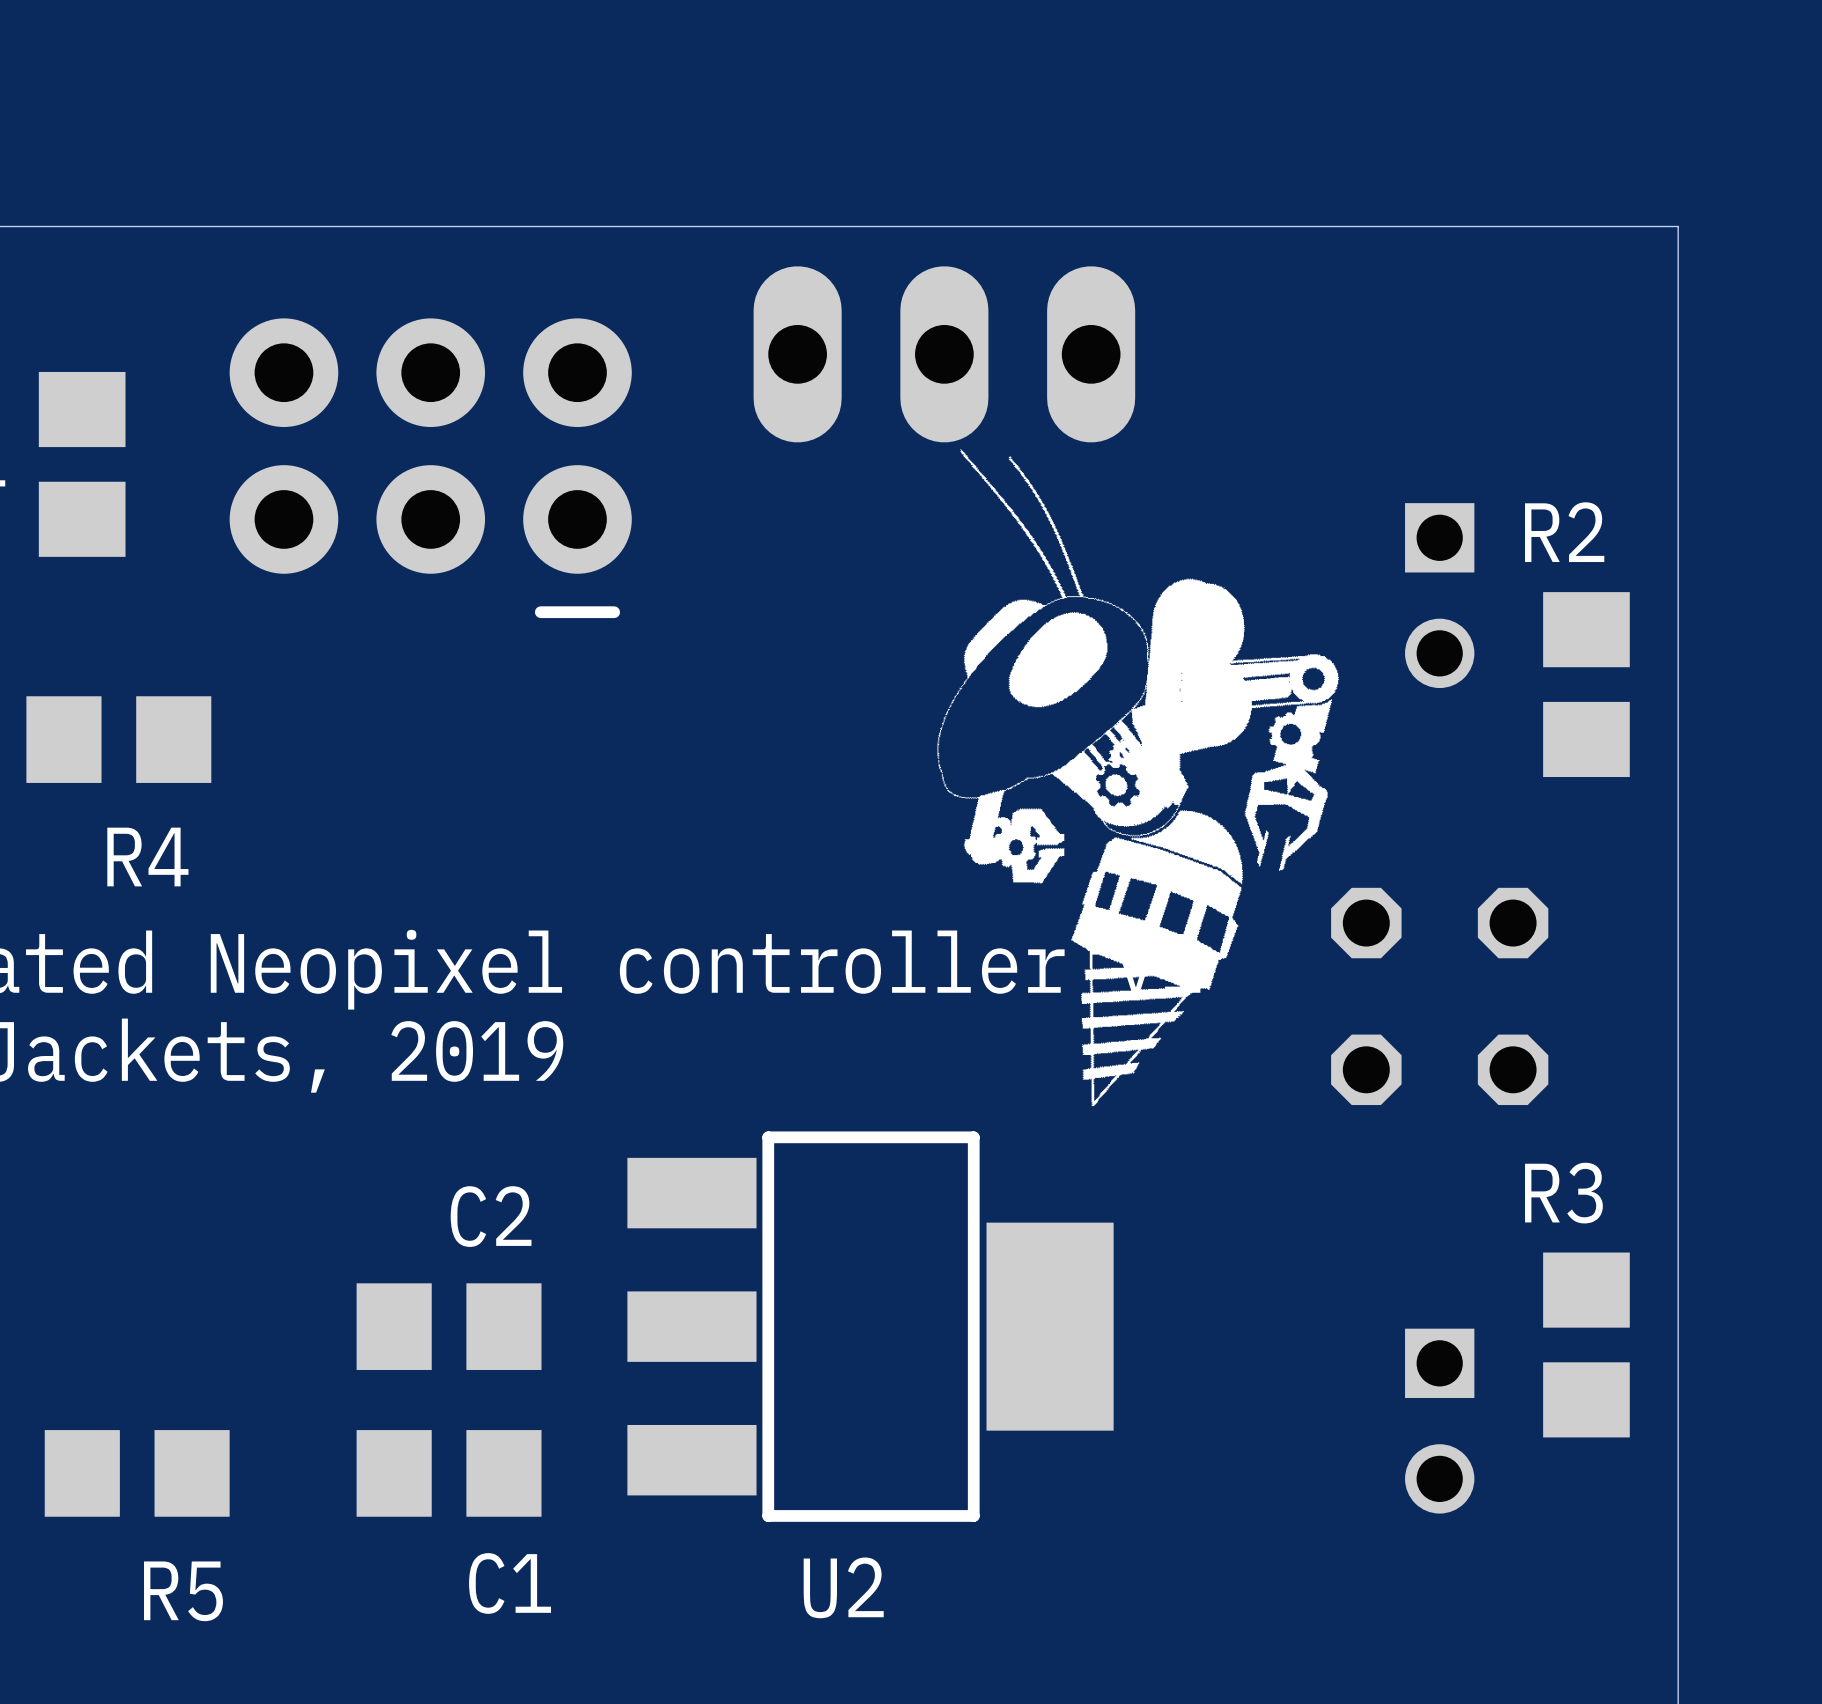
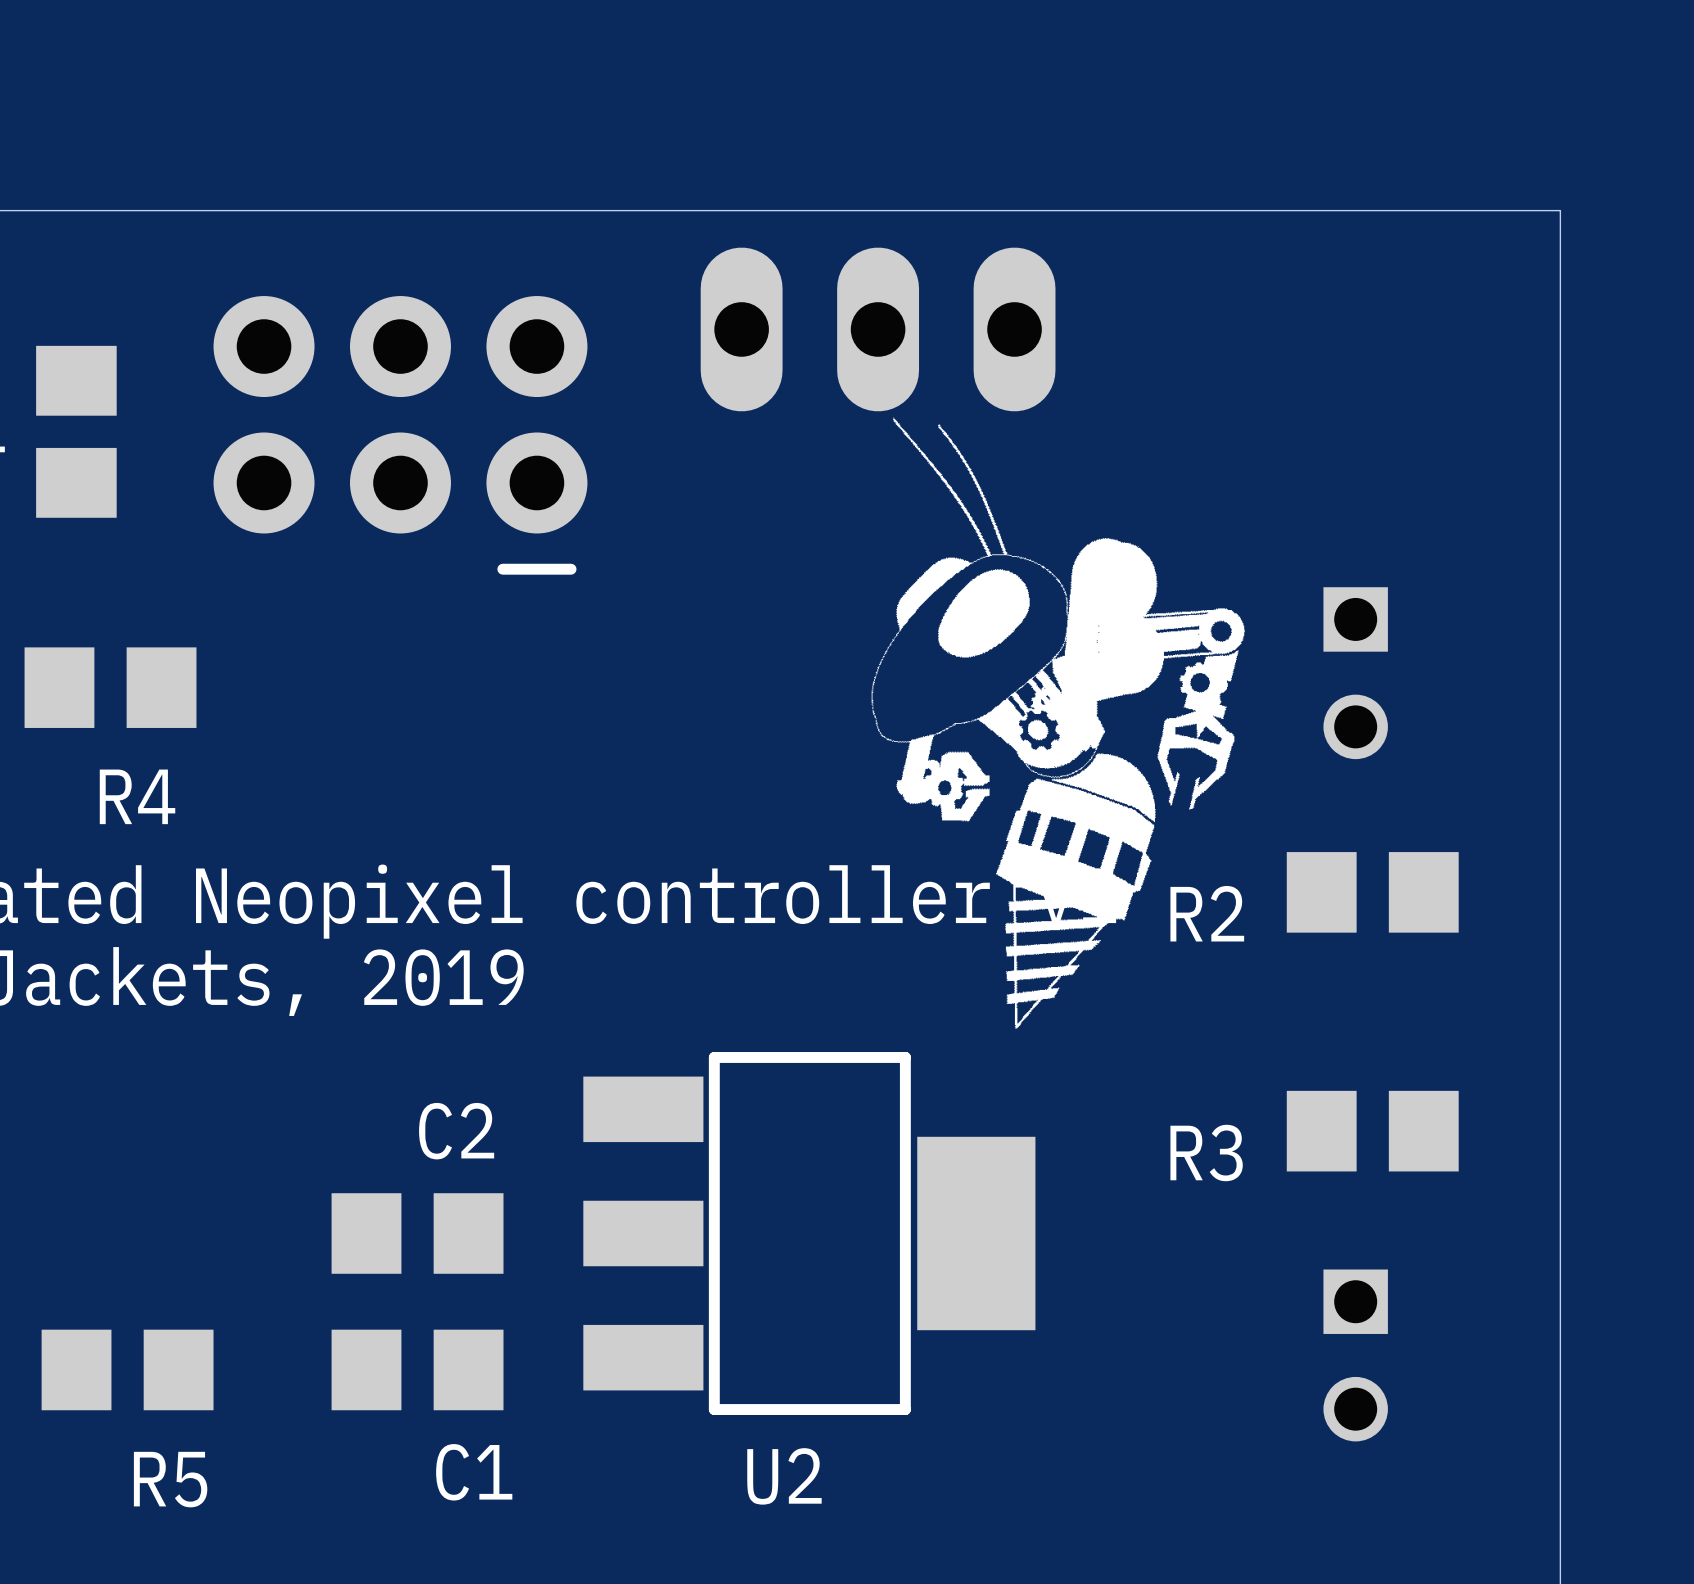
R2 name position: R2 (1564, 532) -> R2 (1207, 913)
part position: (1439, 595) -> (1355, 673)
R2 rotation: 0° (1586, 684) -> 90° clockwise (1372, 892)
R2 position: (1586, 684) -> (1372, 892)
part: (1439, 923) -> none
part: (1439, 1069) -> none
R3 name position: R3 (1563, 1193) -> R3 (1206, 1152)
R3 rotation: 0° (1586, 1344) -> 90° clockwise (1372, 1131)
R3 position: (1586, 1344) -> (1372, 1131)
part position: (1439, 1421) -> (1355, 1355)

